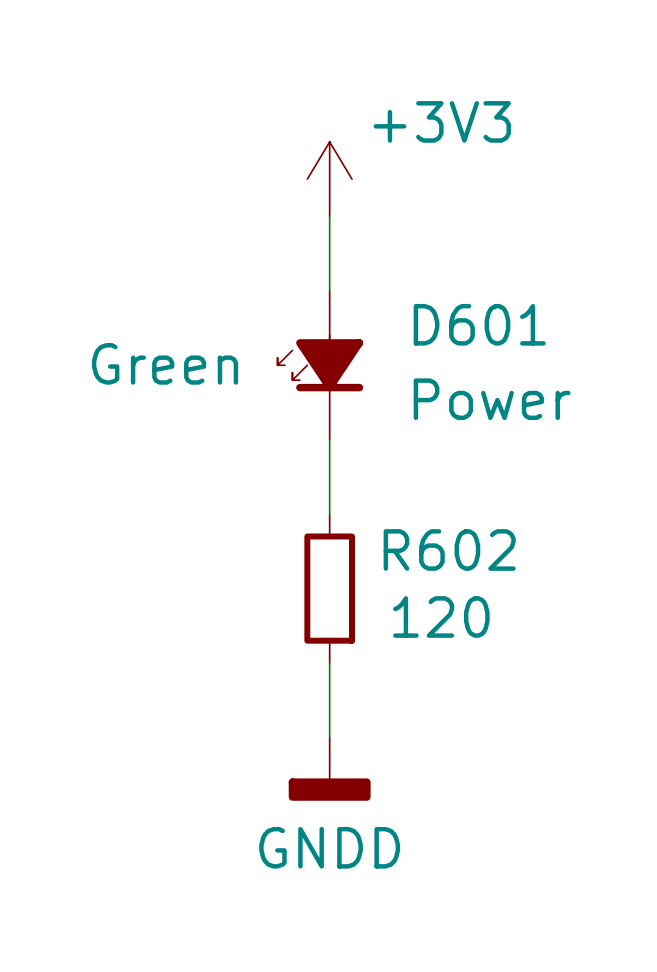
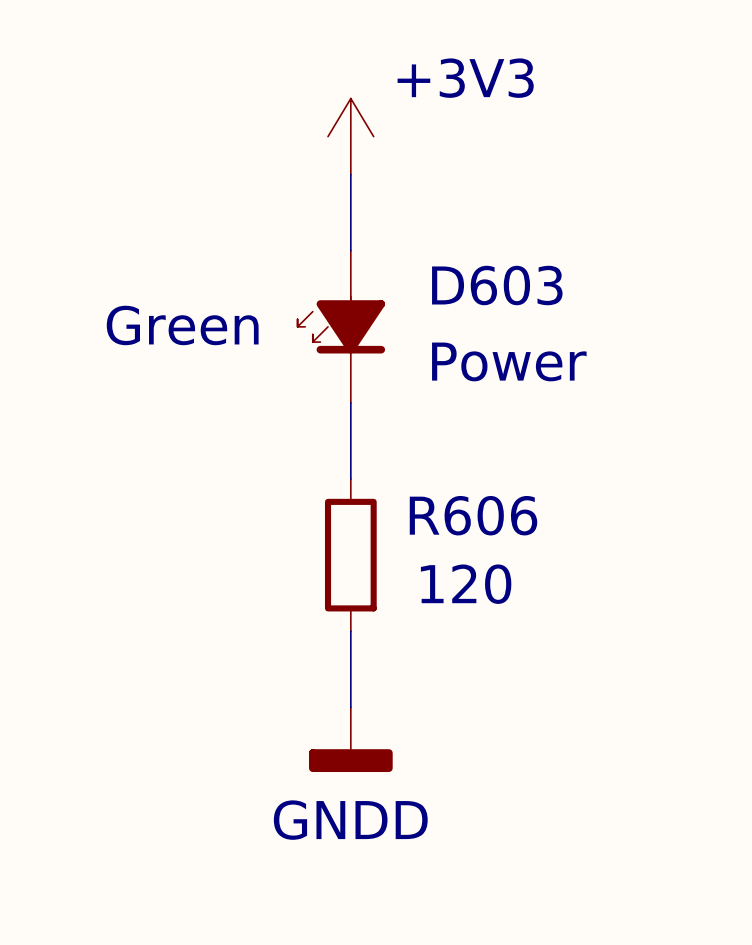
D601 name: D601 (479, 324) -> D603 (497, 285)
R602 name: R602 (449, 549) -> R606 (473, 515)

